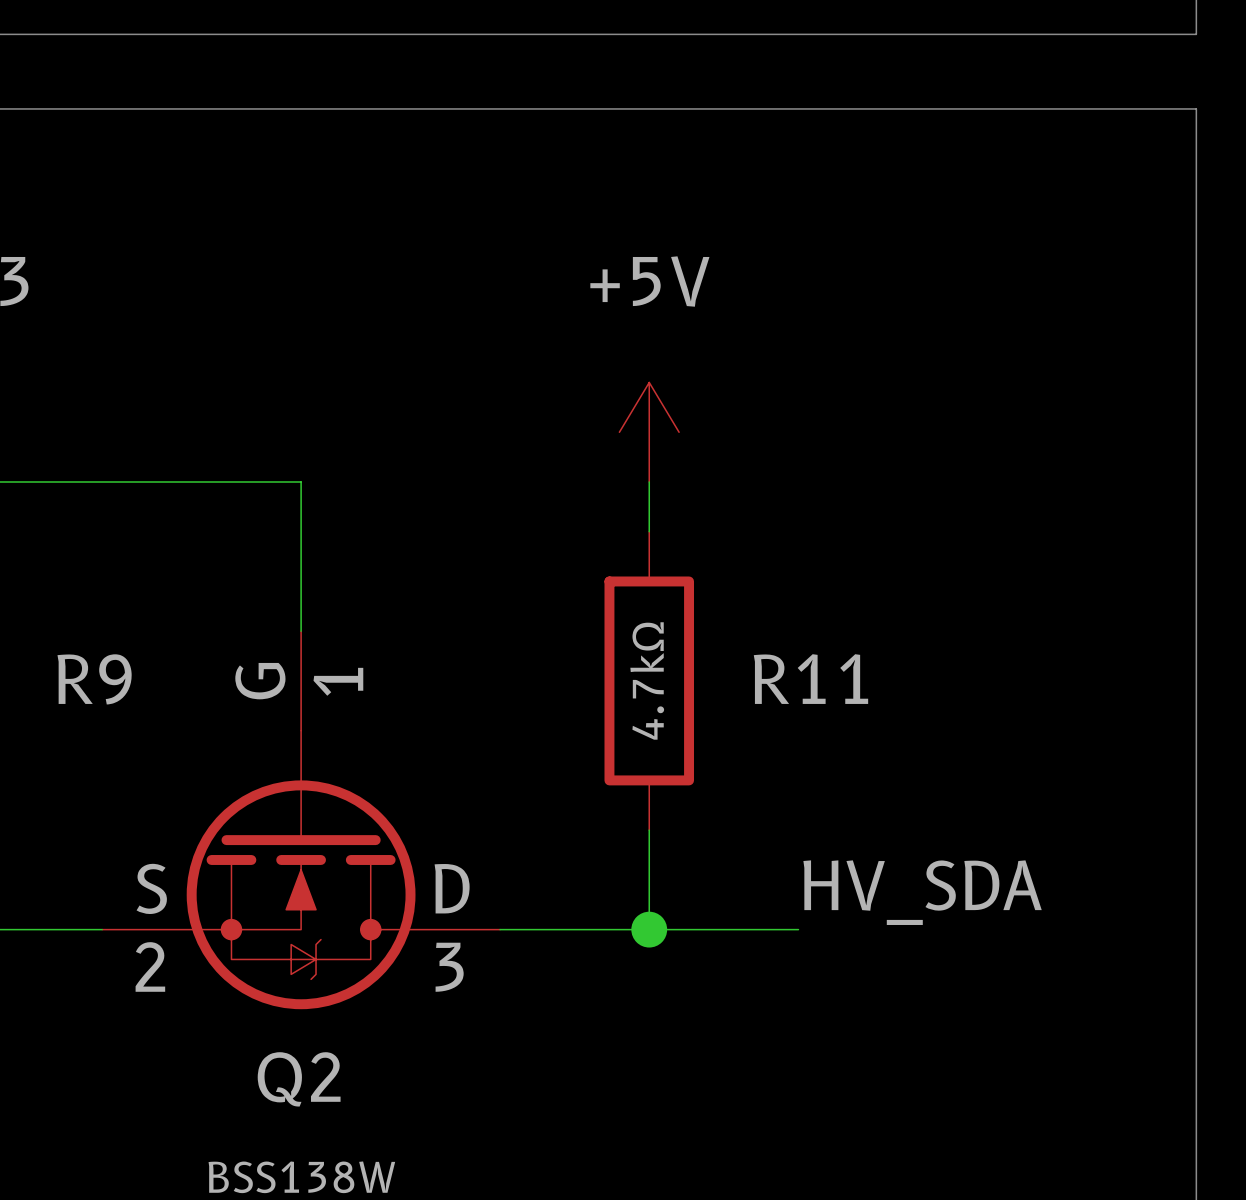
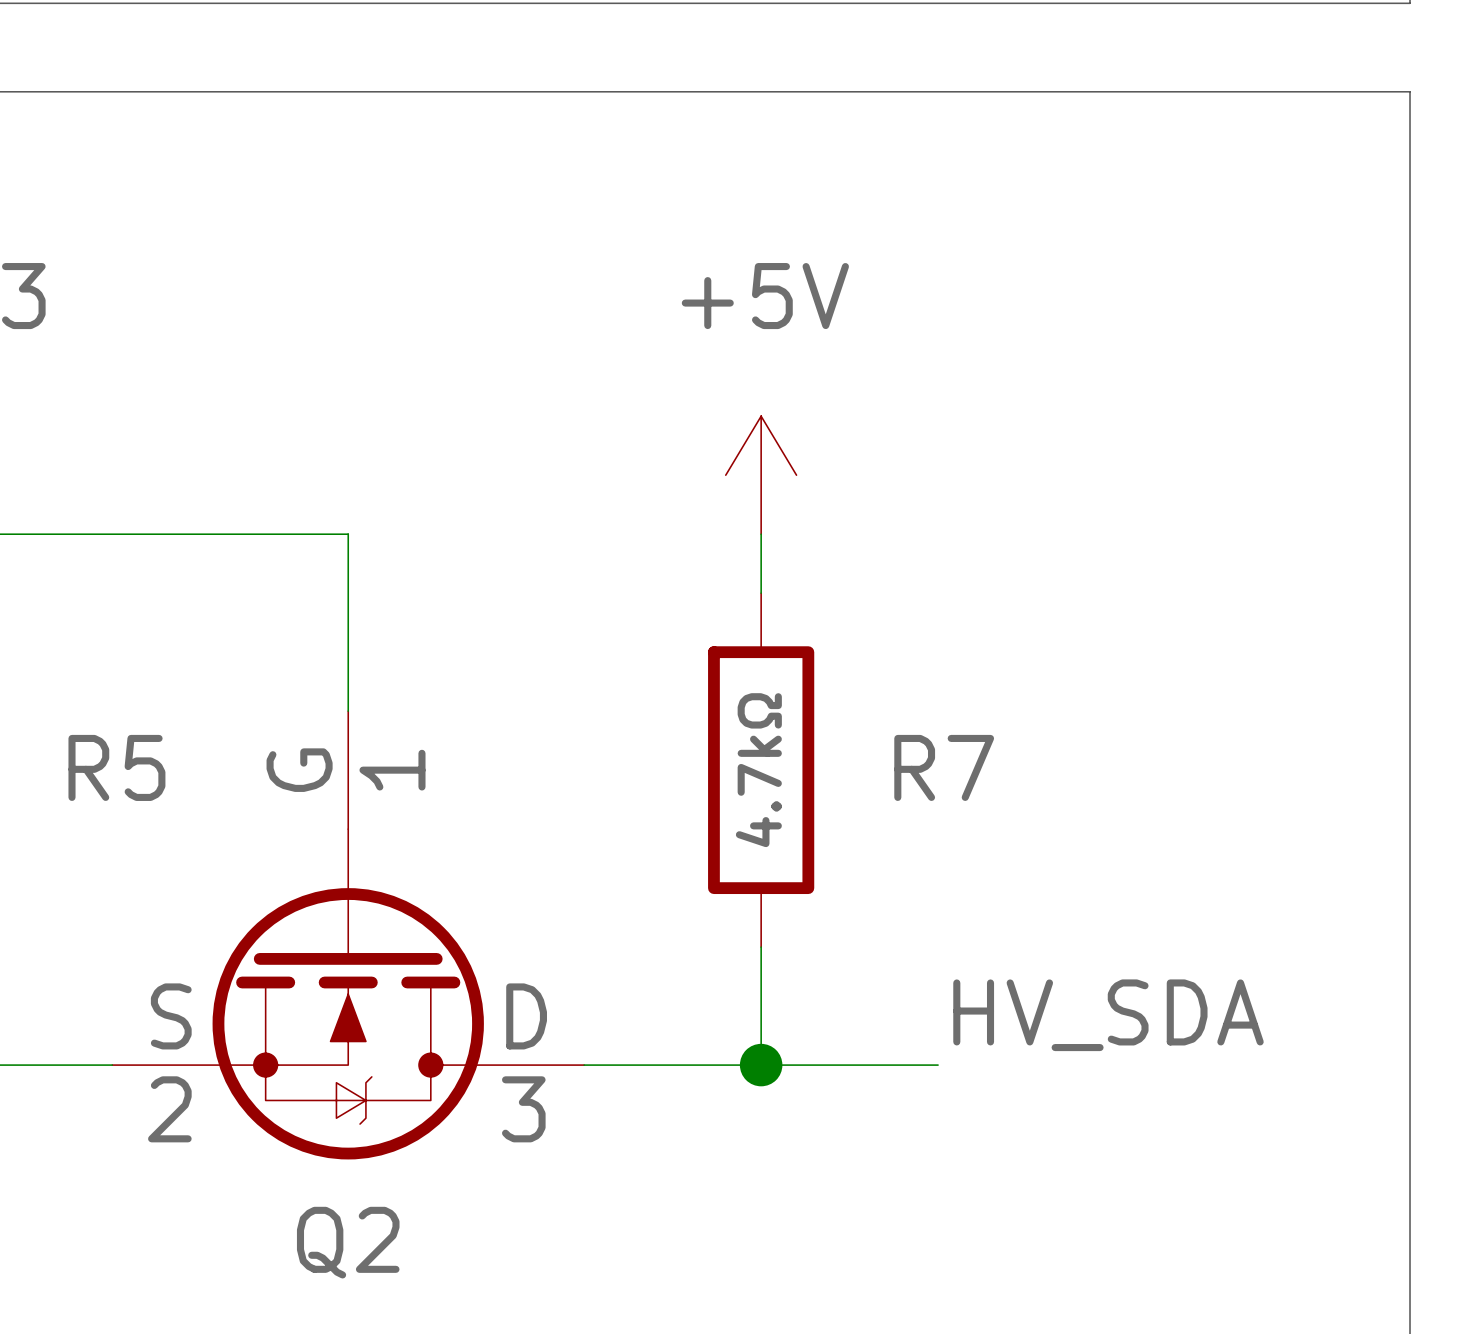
R9 name: R9 (94, 679) -> R5 (116, 767)
R11 name: R11 (810, 679) -> R7 (944, 767)

